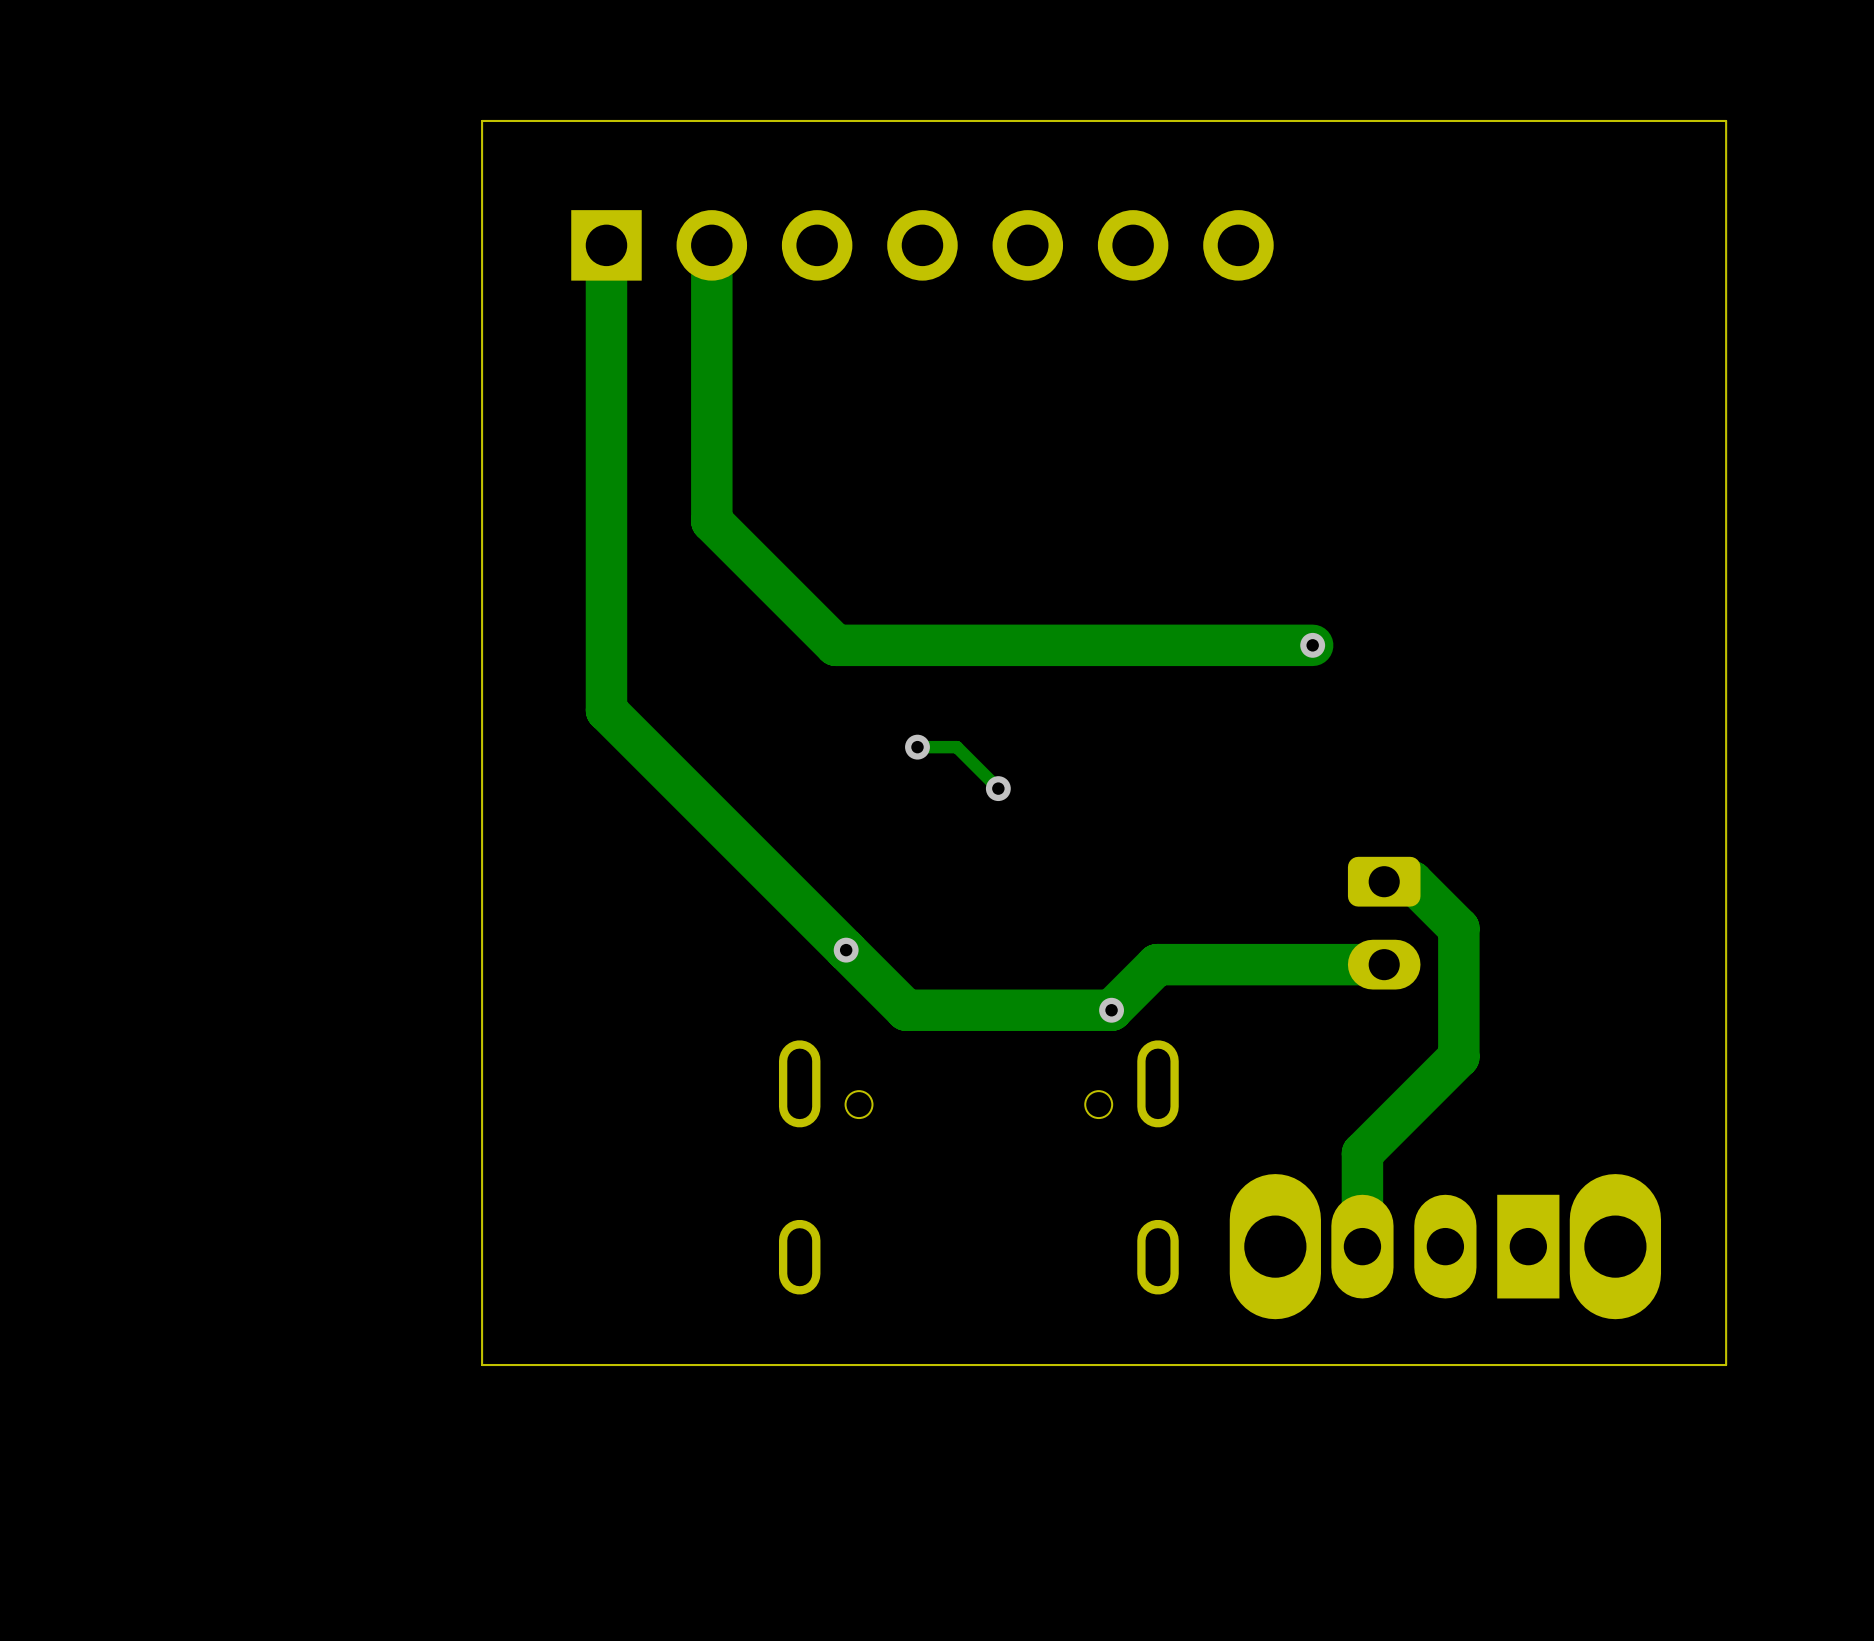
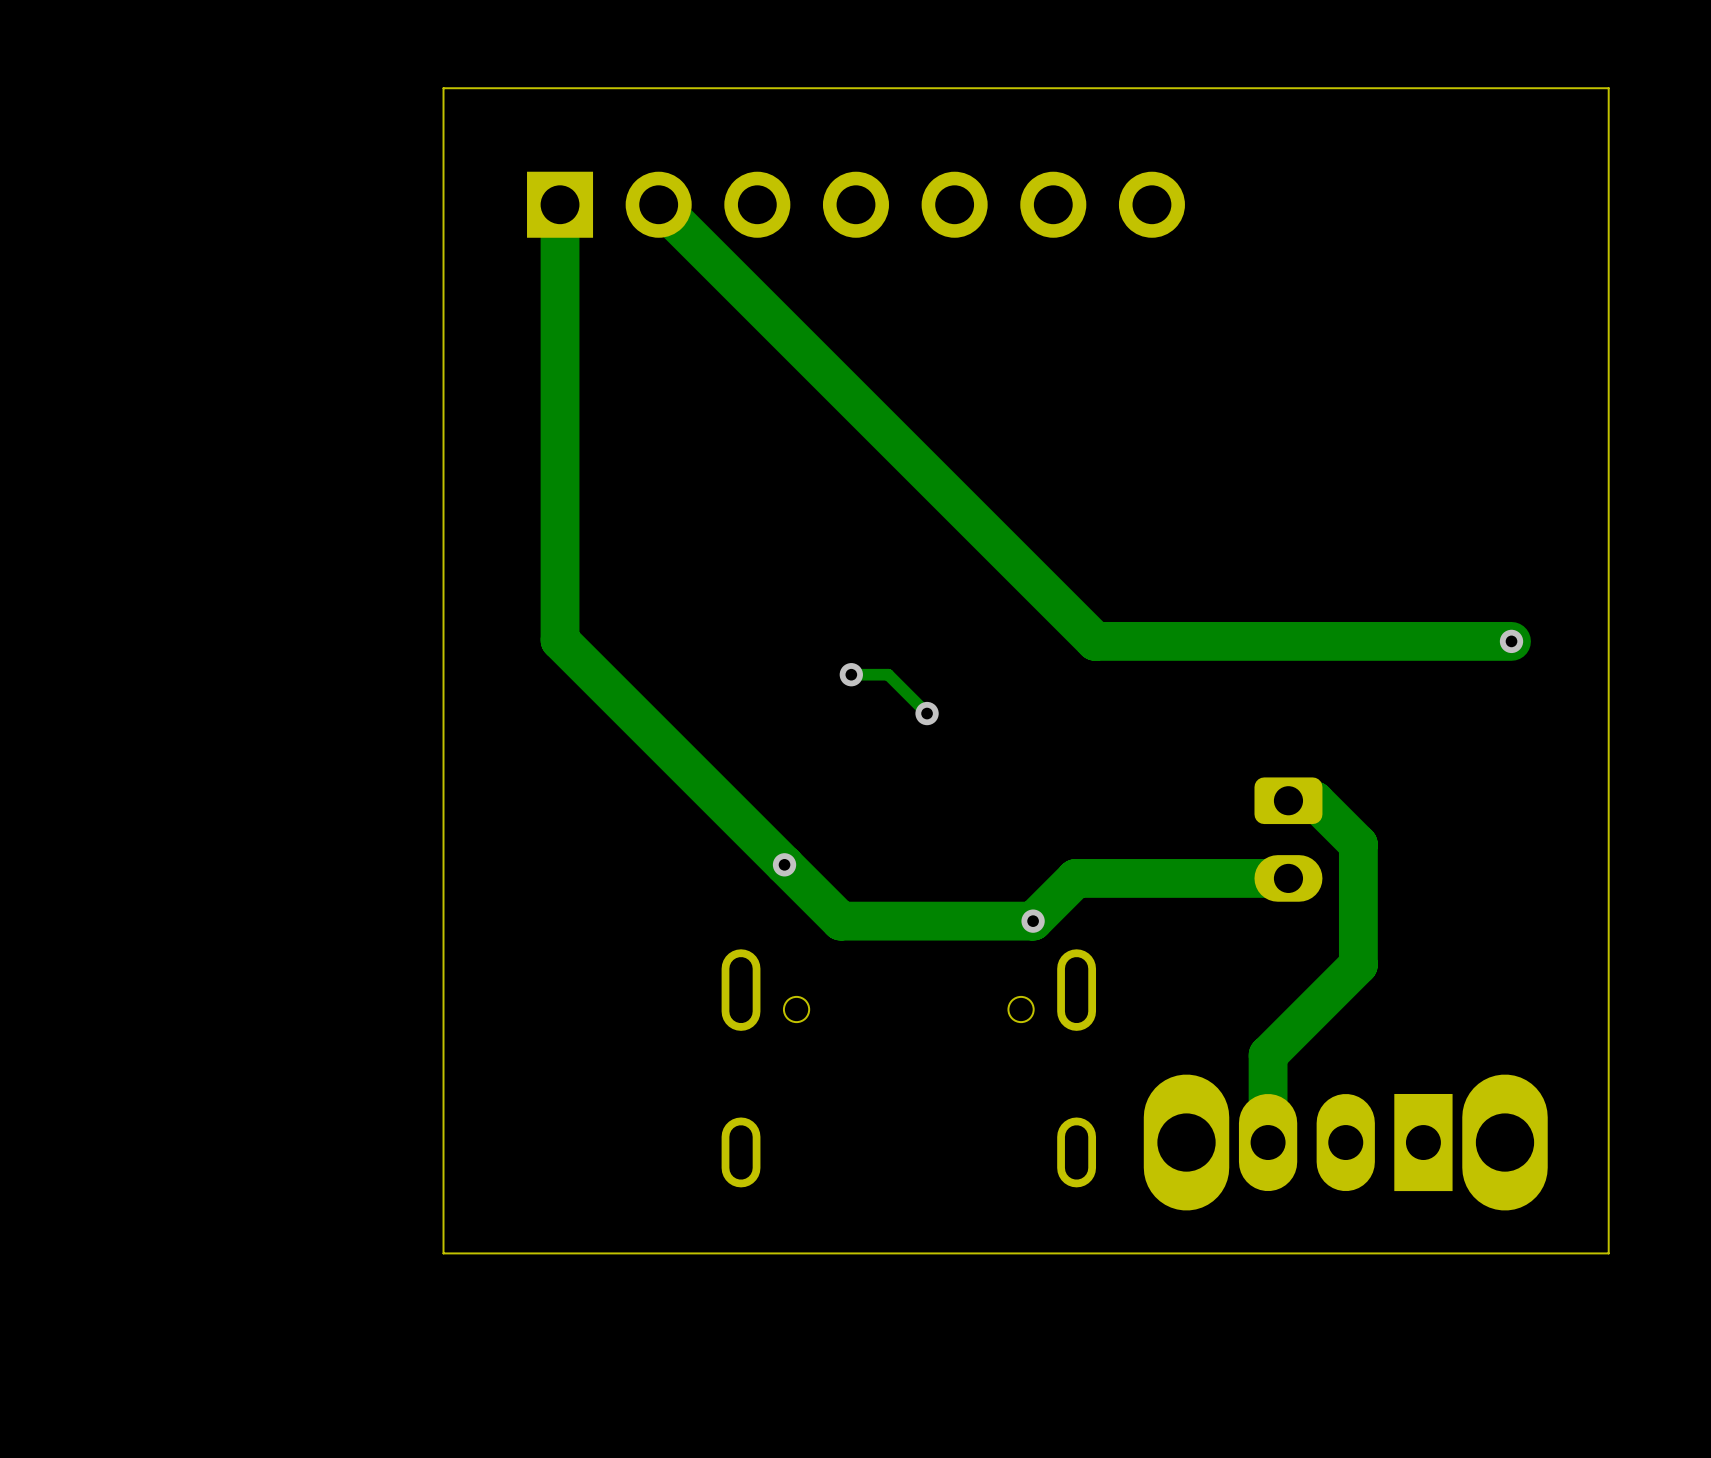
track: (711, 245) (711, 521) (835, 645) (1312, 645) -> (658, 204) (1095, 641) (1511, 641)
via: (1312, 645) -> none
via: none -> (1511, 641)

